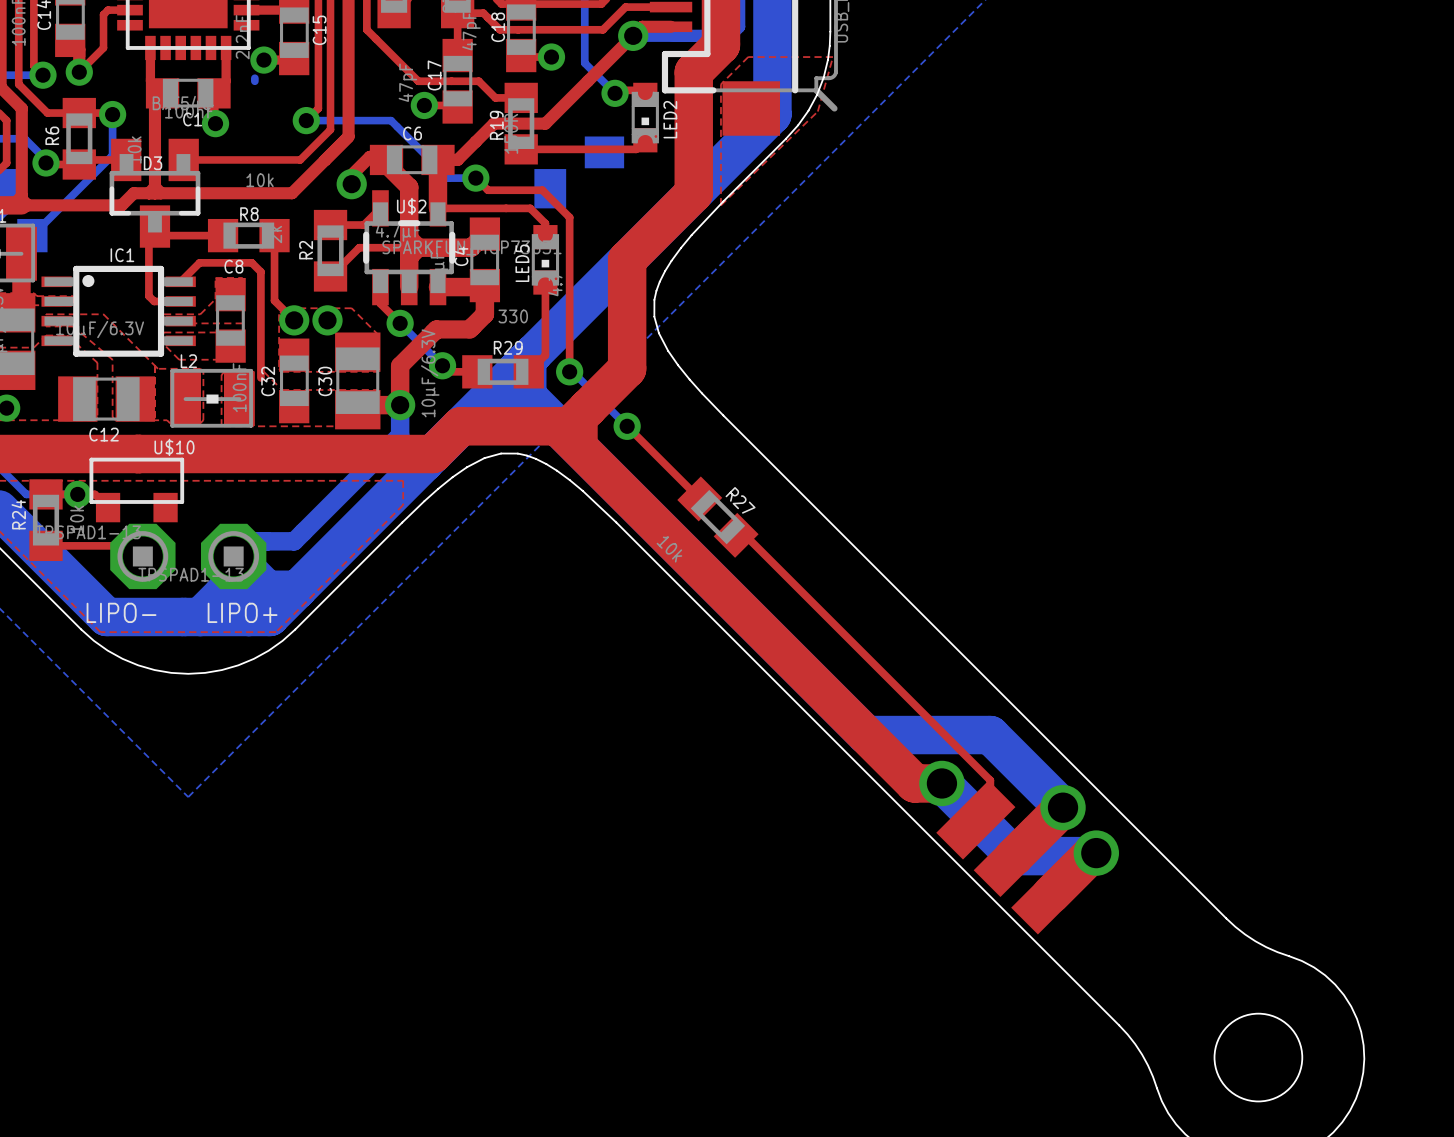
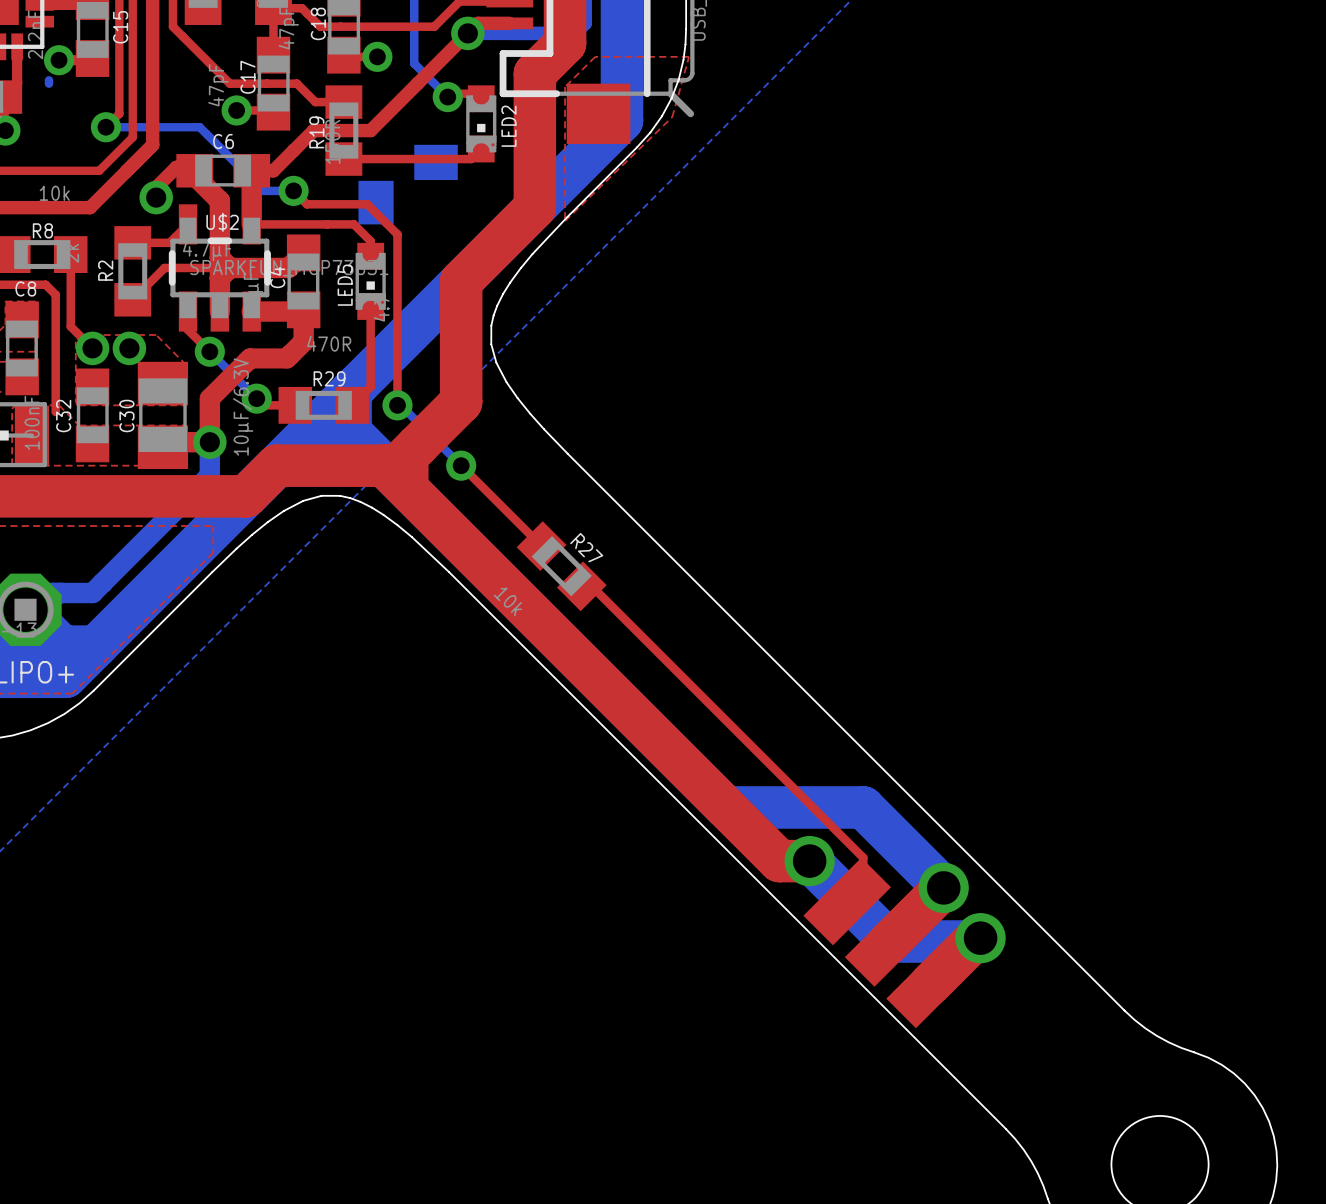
R29 value: 330 (513, 316) -> 470R (329, 343)

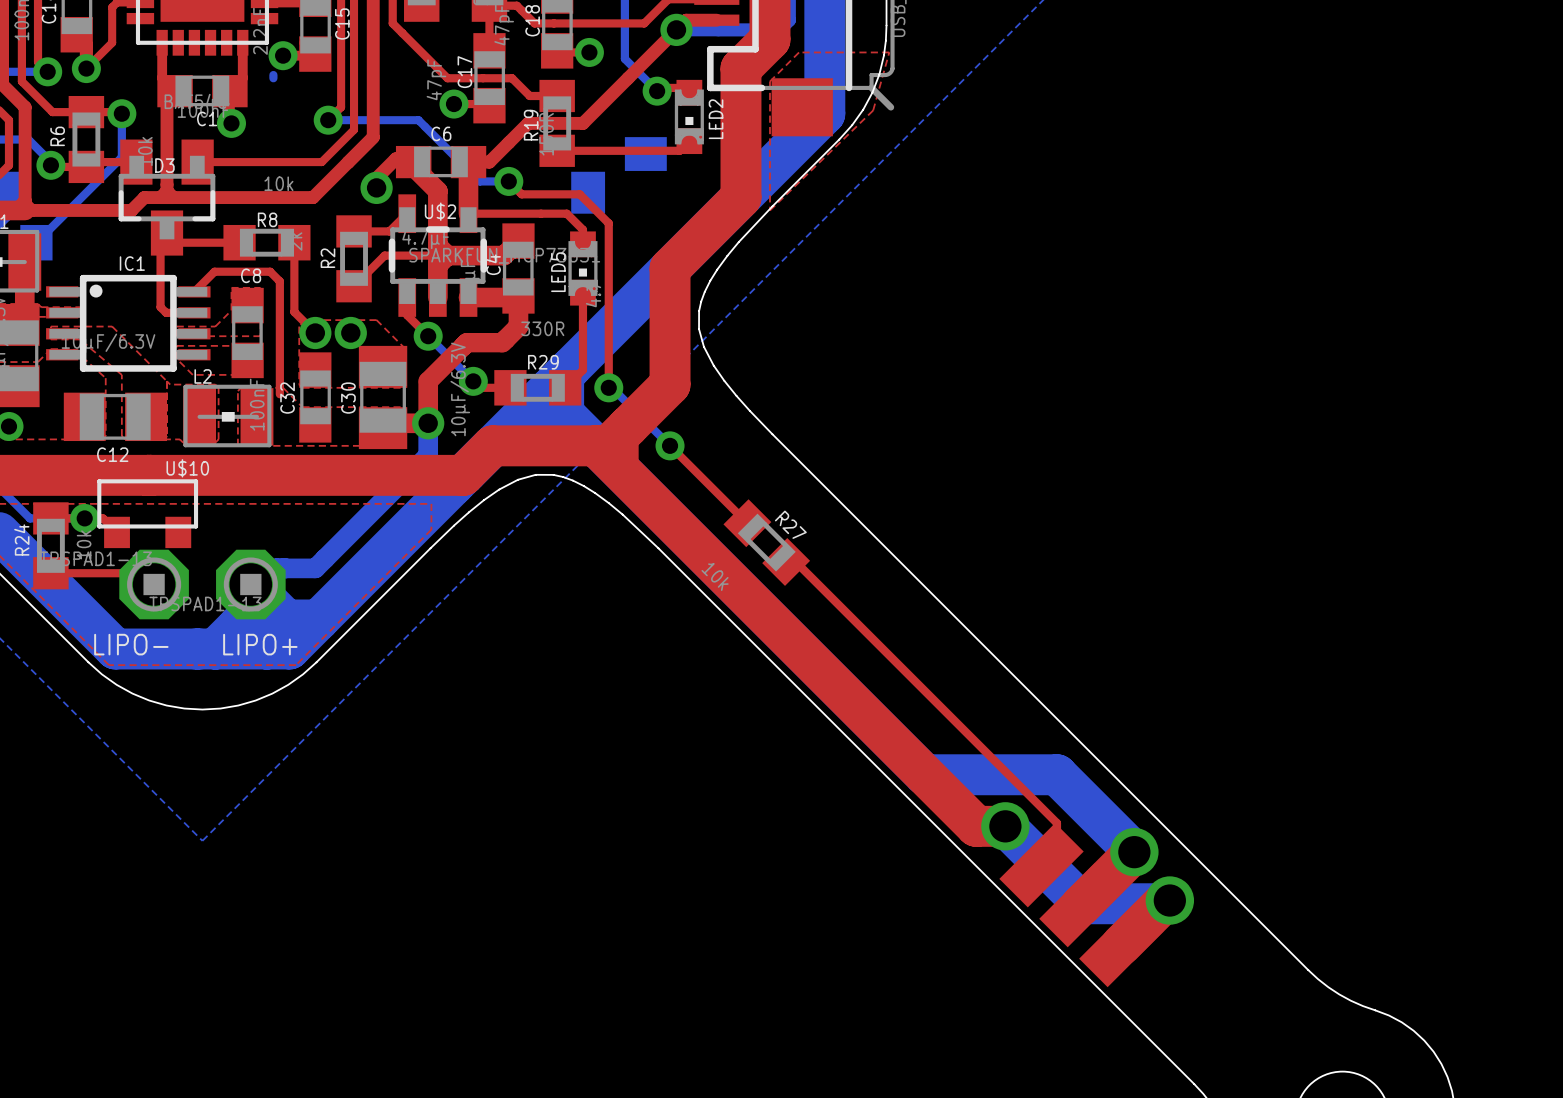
R29 value: 470R (329, 343) -> 330R (542, 328)

